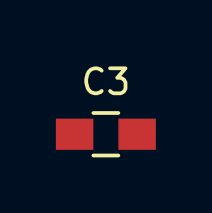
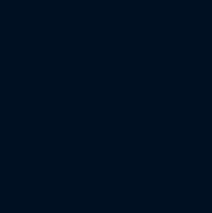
C3: (105, 134) -> none

